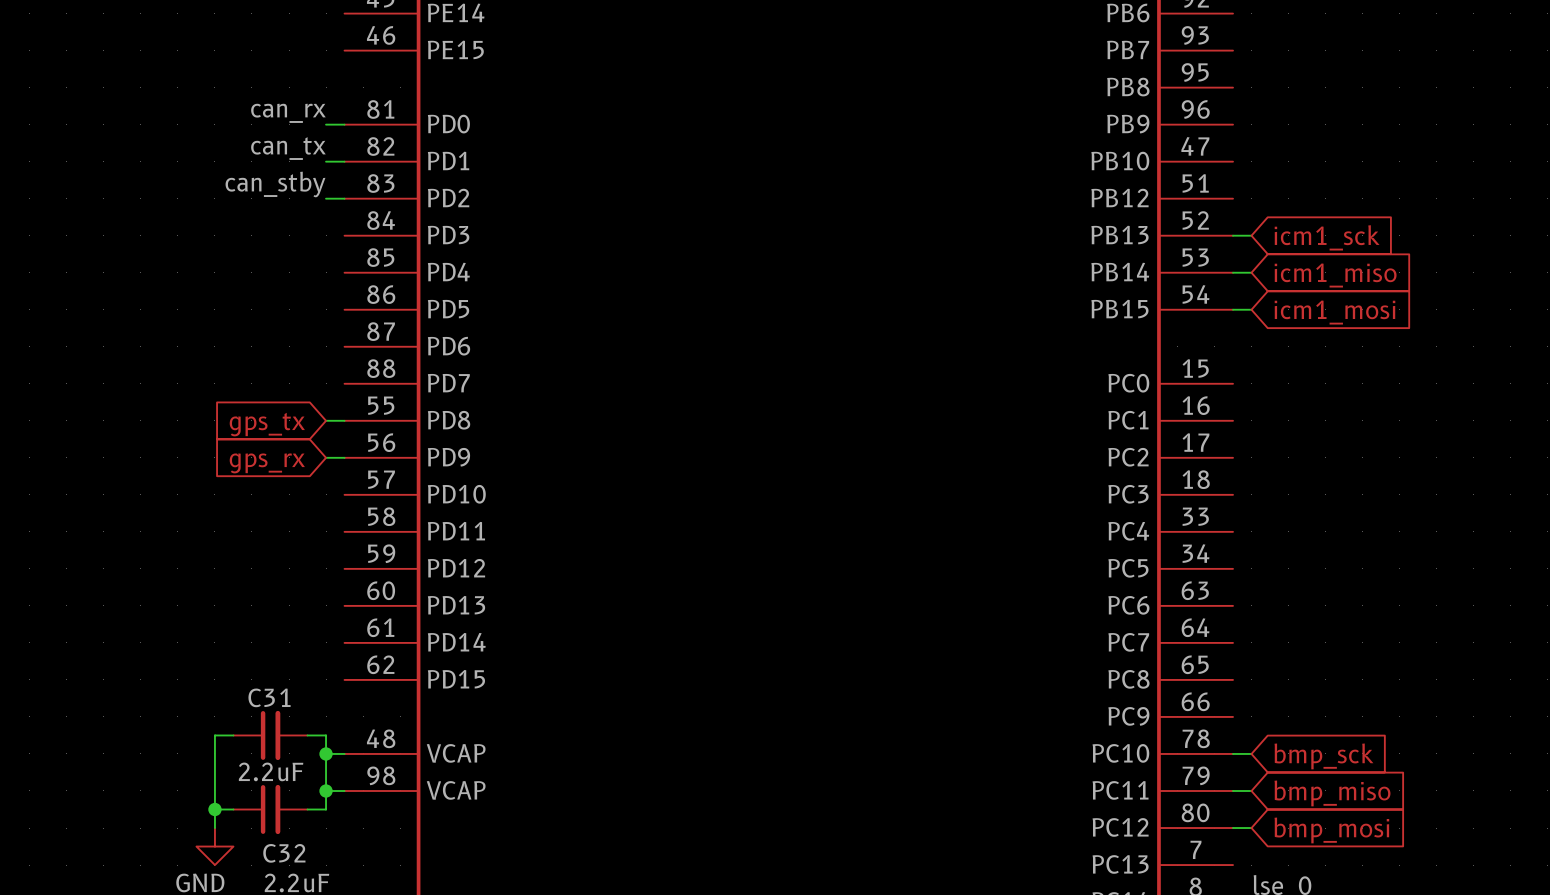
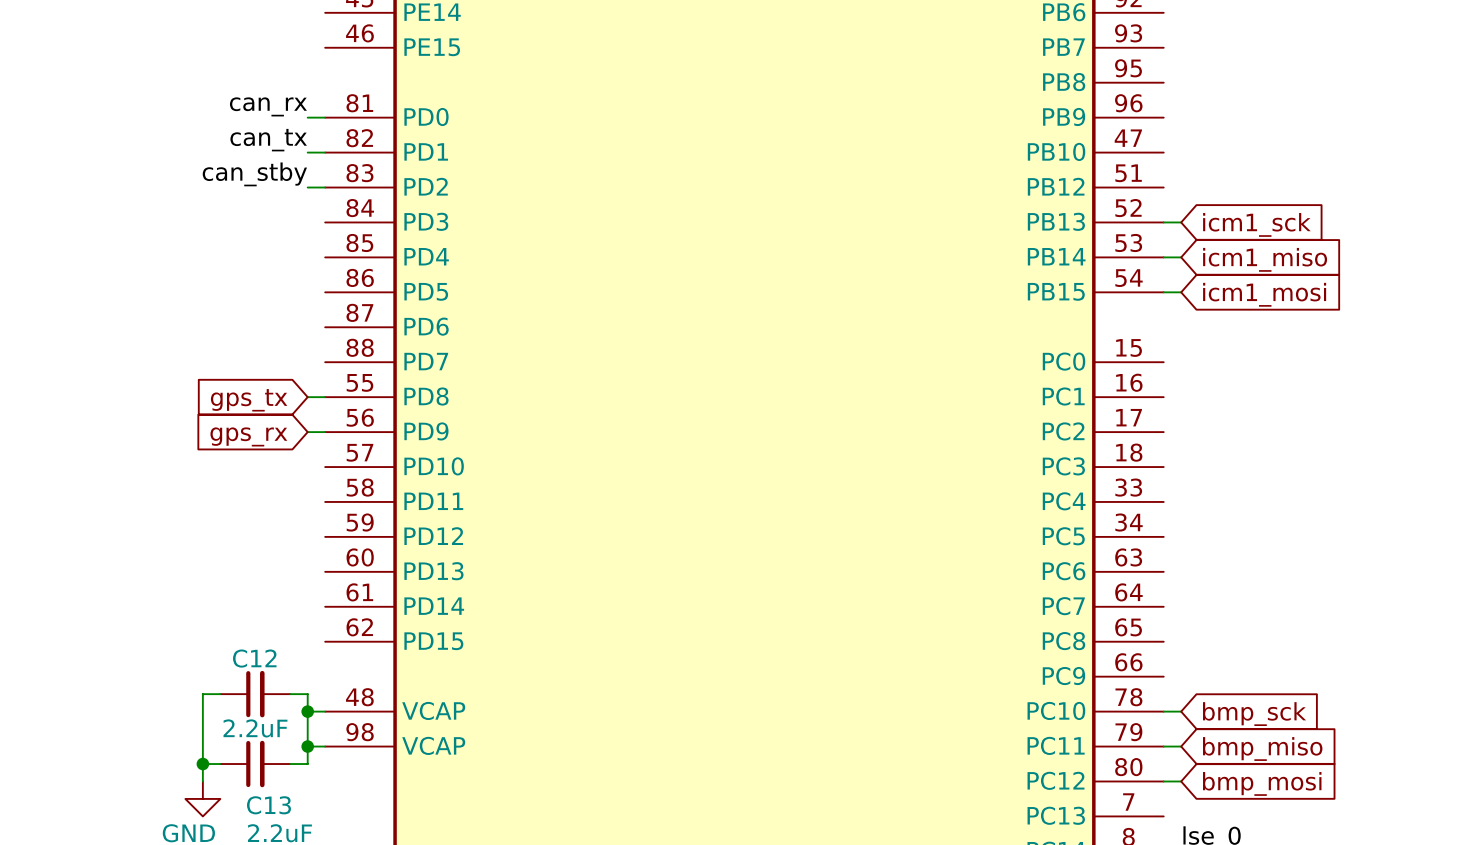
C31 name: C31 (269, 697) -> C12 (254, 658)
C32 name: C32 (284, 853) -> C13 (268, 805)

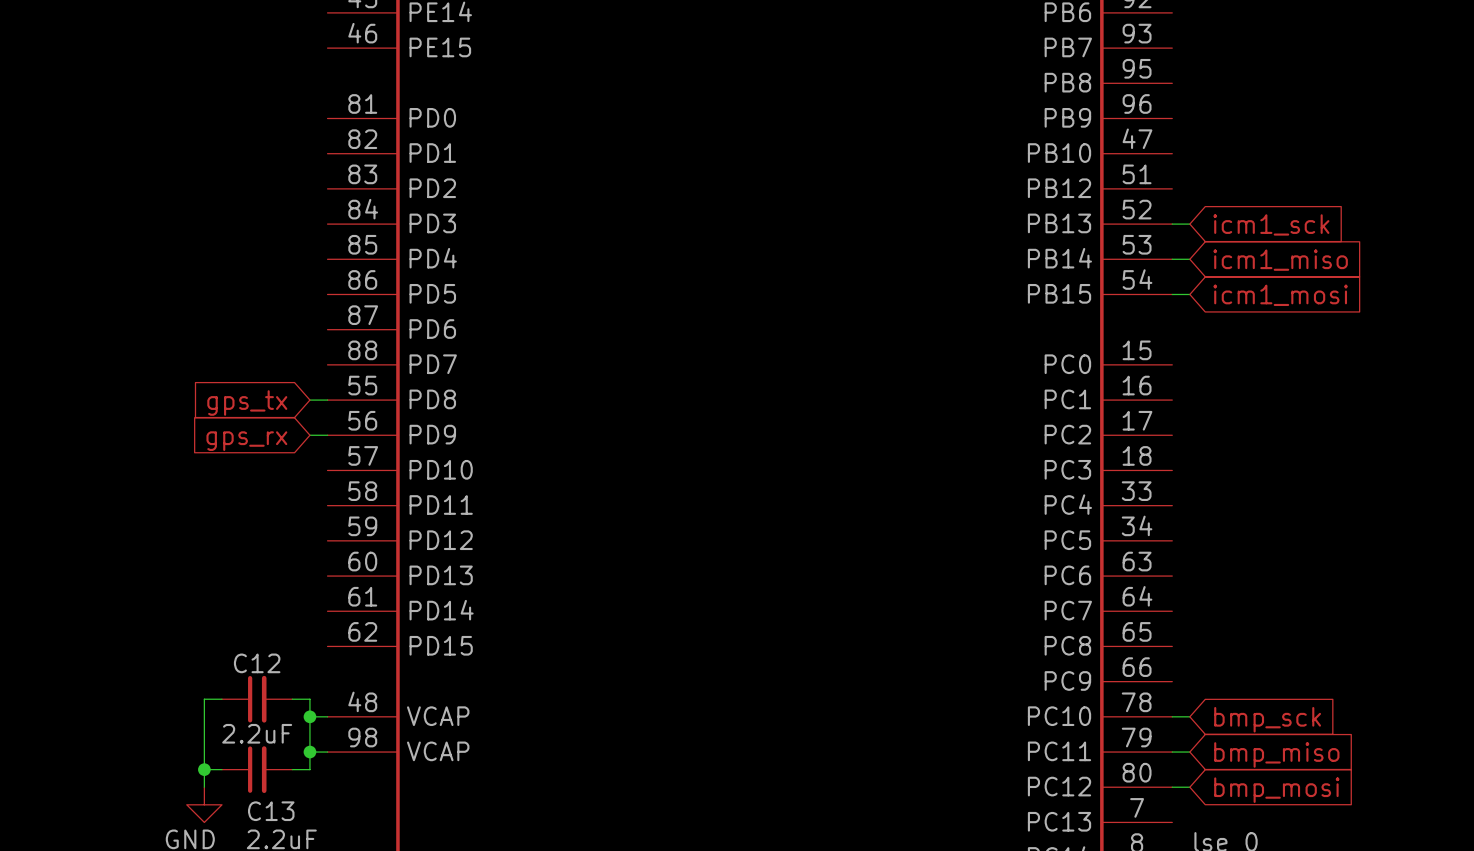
label: can_rx (268, 106) -> none
wire: (307, 117) (325, 117) -> none
label: can_tx (268, 140) -> none
wire: (307, 152) (325, 152) -> none
label: can_stby (254, 174) -> none
wire: (307, 187) (325, 187) -> none

